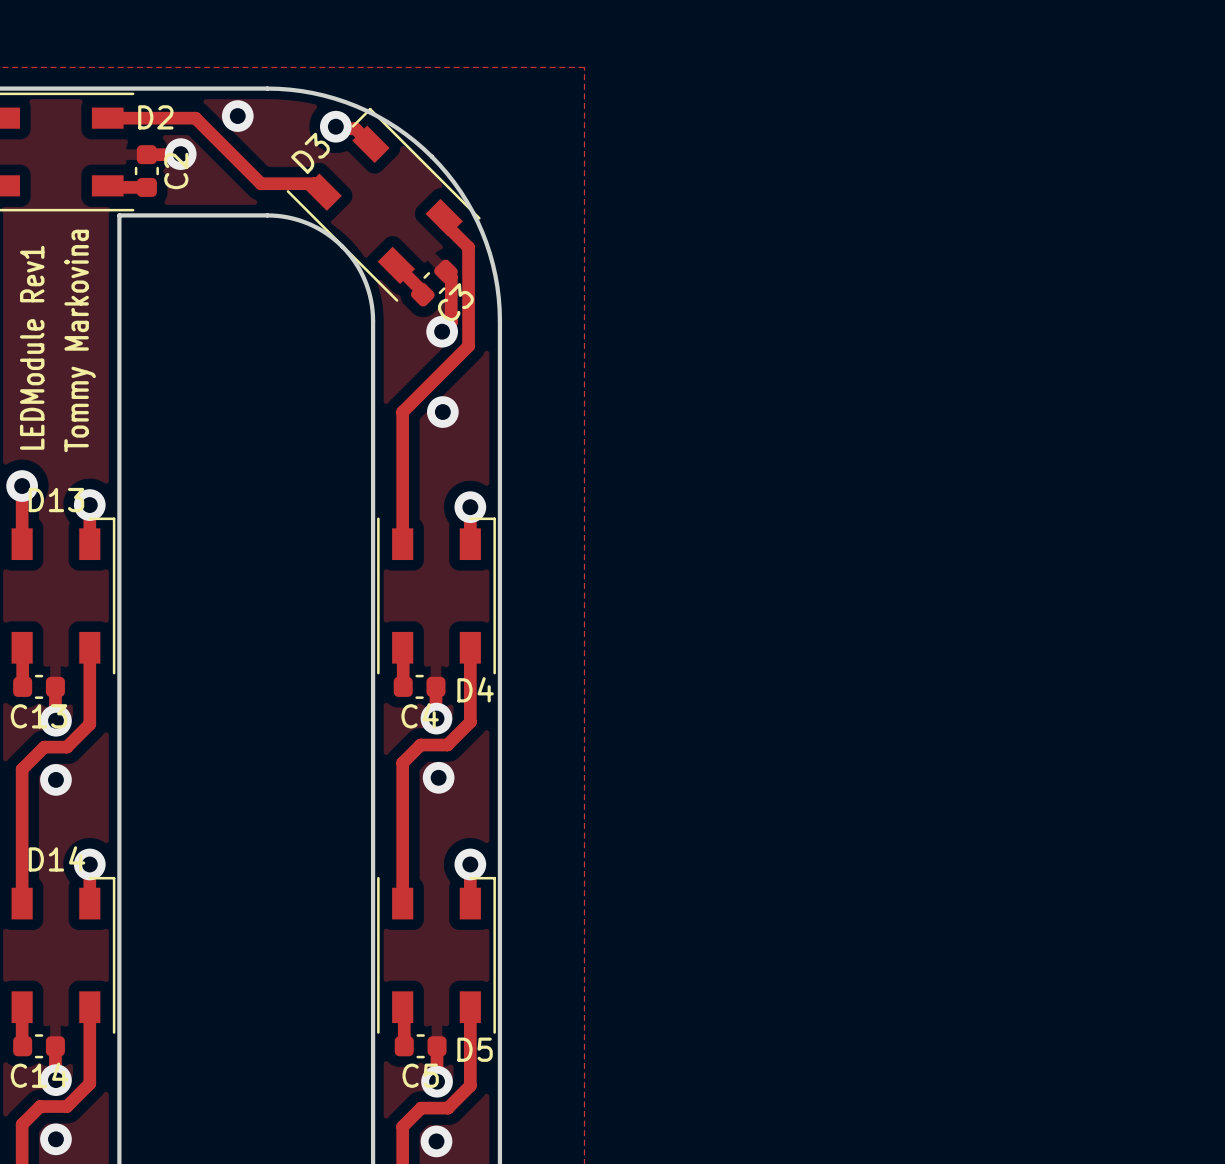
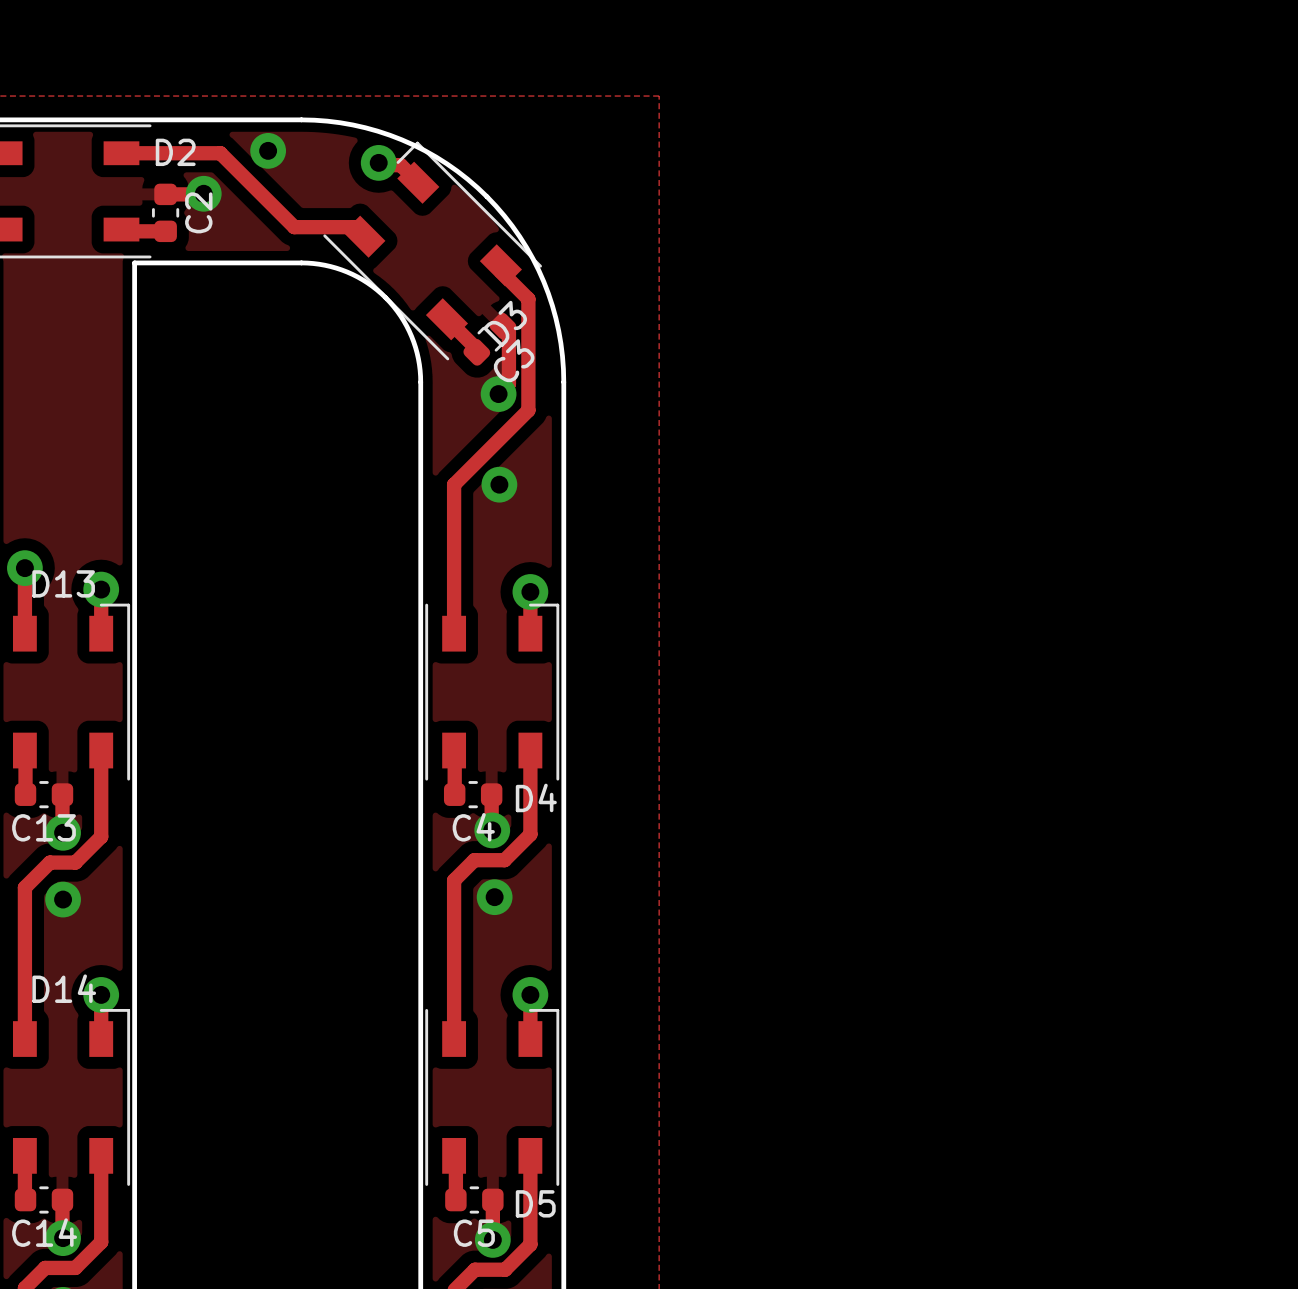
D3 name position: D3 (310, 153) -> D3 (505, 323)
text: Tommy Markovina (80, 340) -> none
text: LEDModule Rev1 (32, 347) -> none

